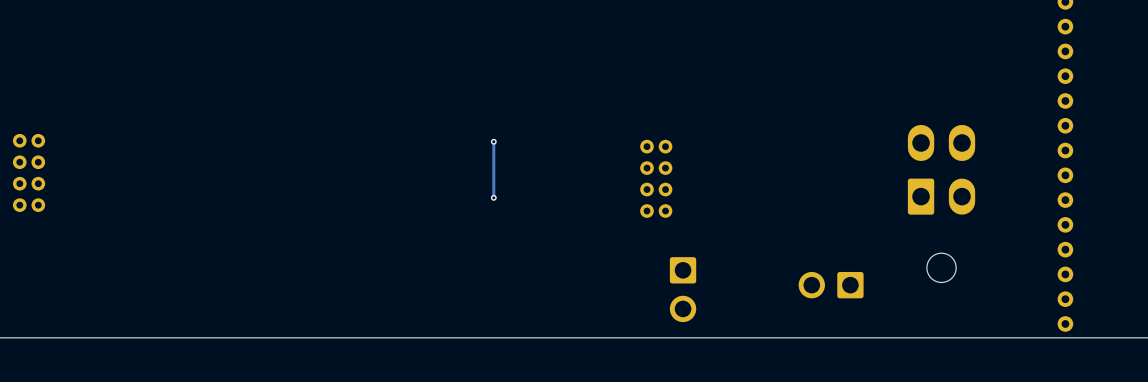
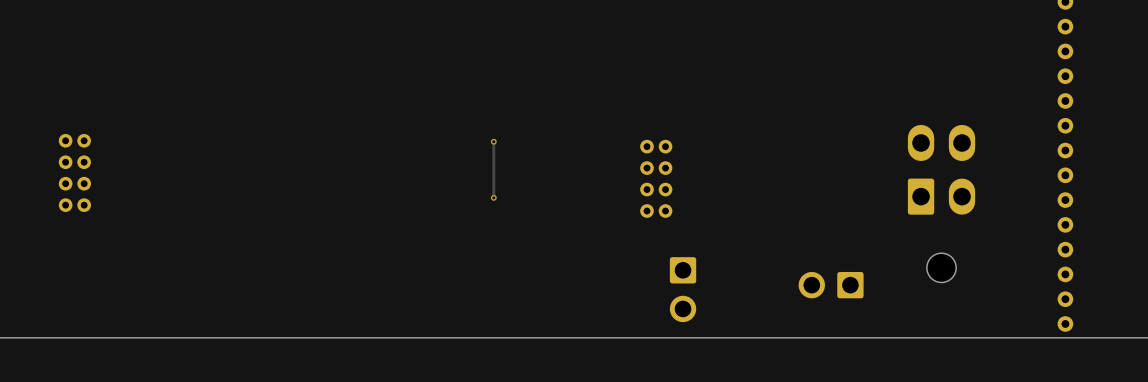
part: (29, 140) -> none
part: none -> (74, 140)
part: (29, 162) -> none
part: none -> (74, 162)
part: (29, 183) -> none
part: none -> (74, 183)
part: (29, 205) -> none
part: none -> (74, 205)

